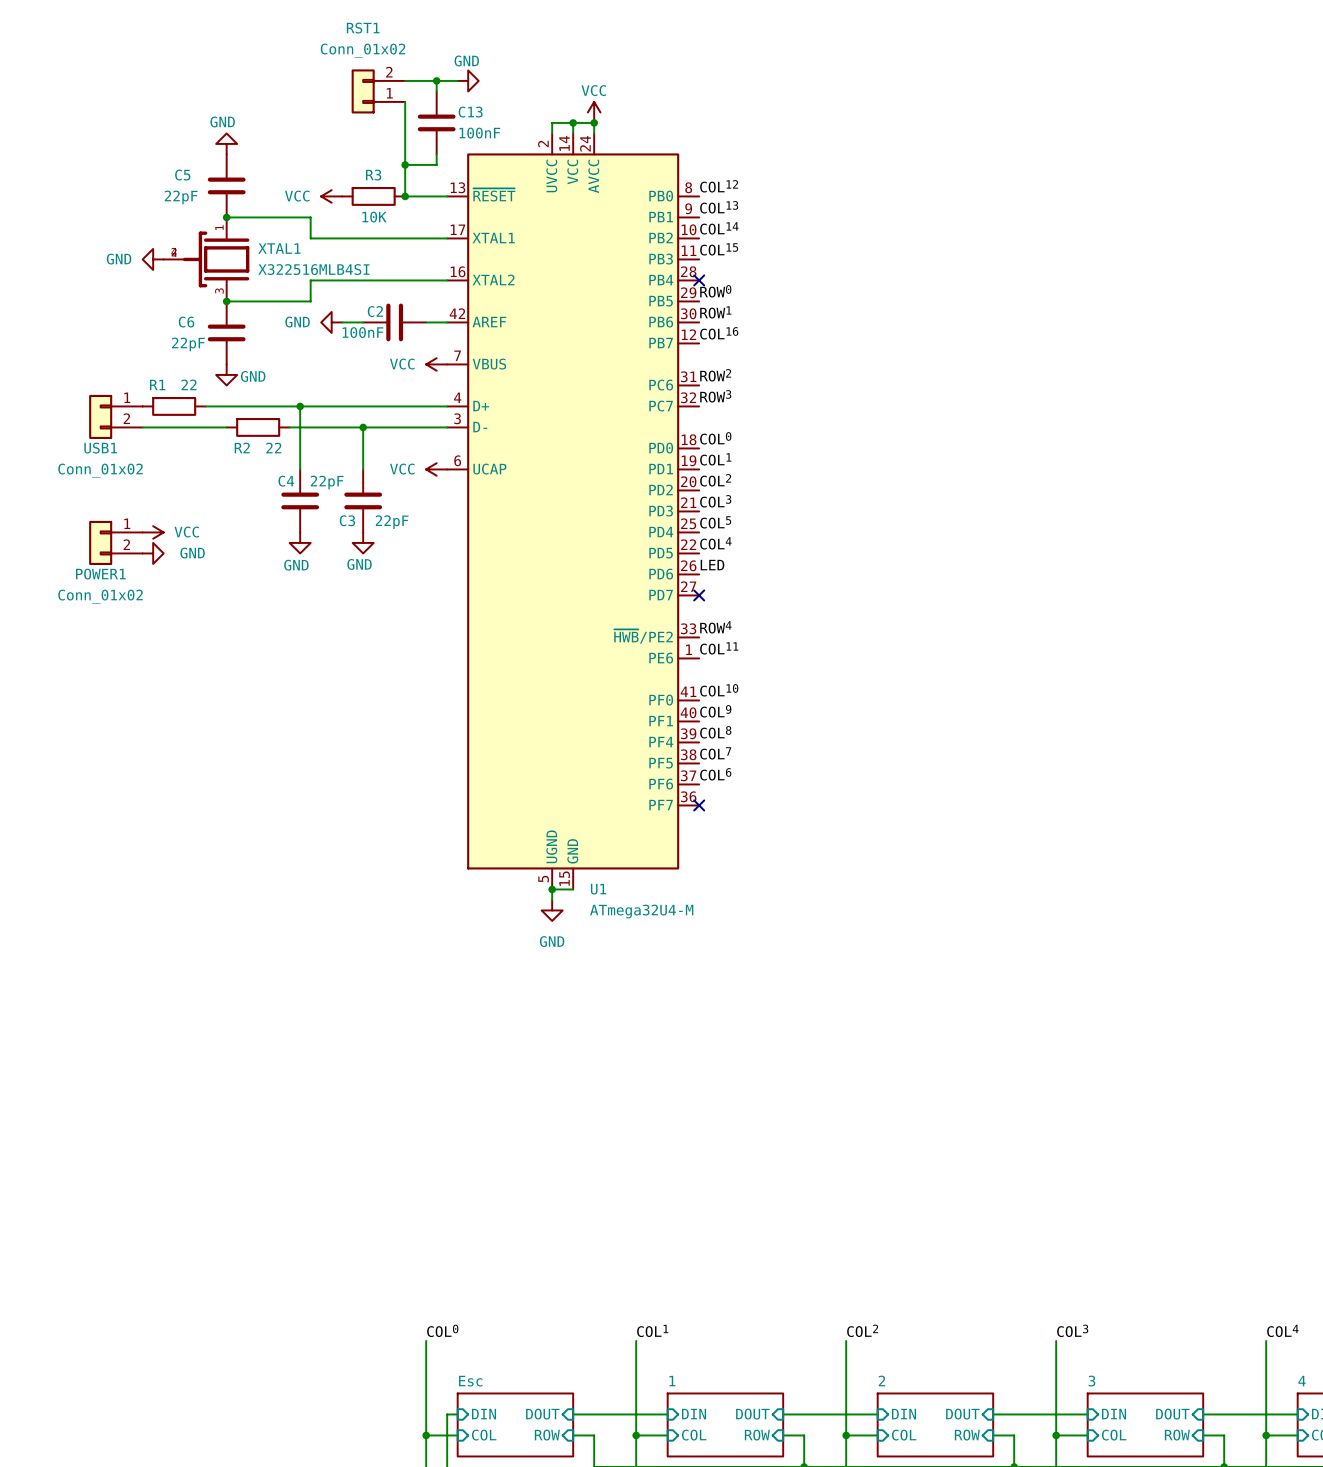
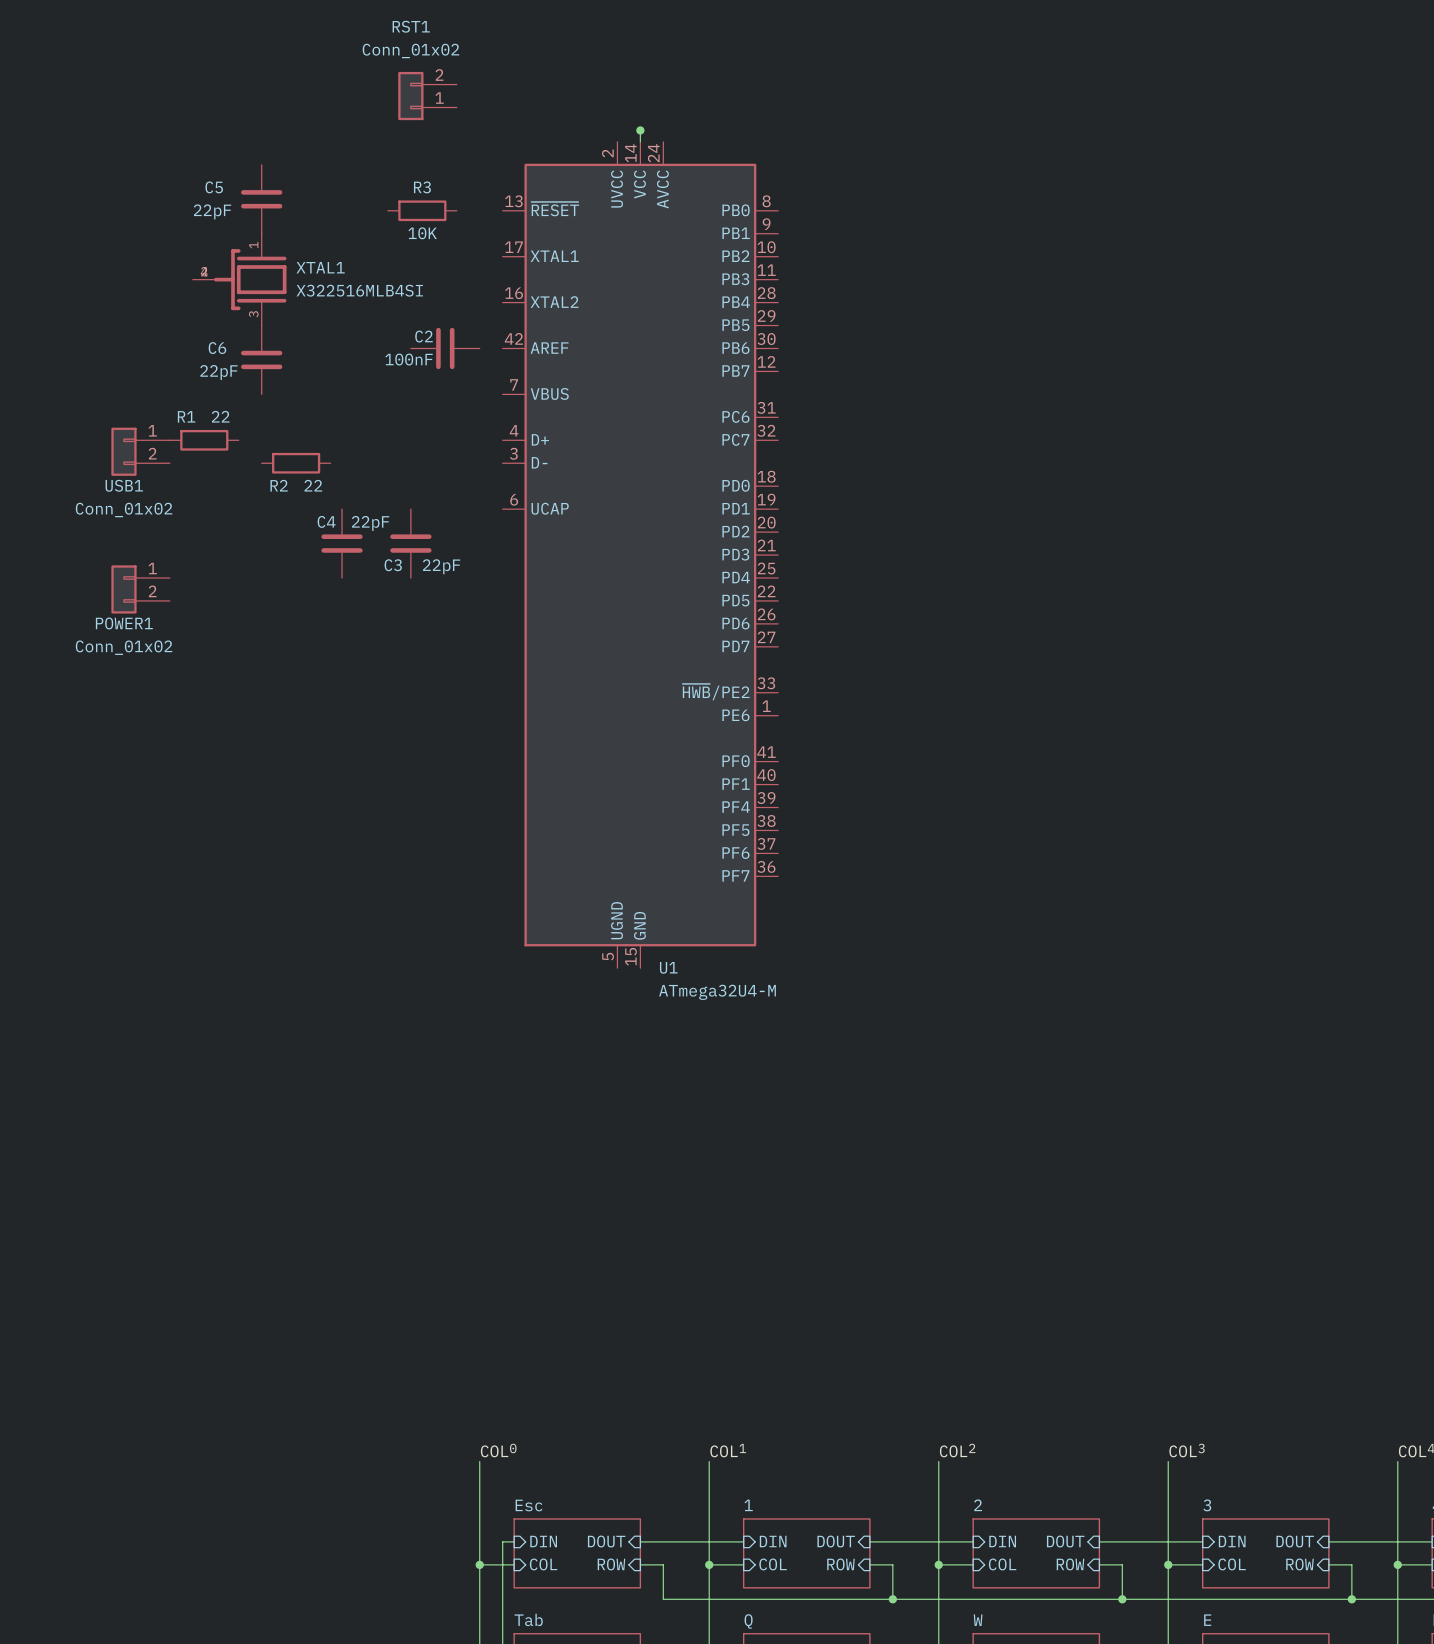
wire: (405, 80) (457, 80) -> none
wire: (436, 80) (436, 91) -> none
junction: (436, 80) -> none
power symbol: GND (468, 80) -> none
wire: (405, 101) (405, 196) (447, 196) -> none
power symbol: VCC (594, 112) -> none
C13: 100nF (436, 122) -> none
junction: (594, 122) -> none
wire: (552, 133) (552, 122) (594, 122) (594, 133) -> none
power symbol: GND (226, 143) -> none
wire: (436, 154) (436, 164) (405, 164) -> none
junction: (405, 164) -> none
label: COL12 (719, 186) -> none
power symbol: VCC (331, 196) -> none
junction: (405, 196) -> none
label: COL13 (719, 207) -> none
wire: (226, 217) (310, 217) (310, 238) (447, 238) -> none
junction: (226, 217) -> none
label: COL14 (719, 228) -> none
label: COL15 (719, 249) -> none
power symbol: GND (153, 259) -> none
wire: (447, 280) (310, 280) (310, 301) (226, 301) -> none
no-connect mark: (699, 280) -> none
label: ROW0 (715, 291) -> none
junction: (226, 301) -> none
label: ROW1 (715, 312) -> none
power symbol: GND (331, 322) -> none
wire: (342, 322) (363, 322) -> none
wire: (426, 322) (447, 322) -> none
label: COL16 (719, 333) -> none
power symbol: VCC (436, 364) -> none
power symbol: GND (226, 374) -> none
label: ROW2 (715, 375) -> none
label: ROW3 (715, 396) -> none
wire: (205, 406) (447, 406) -> none
wire: (300, 406) (300, 469) -> none
junction: (300, 406) -> none
wire: (142, 427) (226, 427) -> none
wire: (289, 427) (447, 427) -> none
wire: (363, 427) (363, 469) -> none
junction: (363, 427) -> none
label: COL0 (715, 438) -> none
label: COL1 (715, 459) -> none
power symbol: VCC (436, 469) -> none
label: COL2 (715, 480) -> none
label: COL3 (715, 501) -> none
label: COL5 (715, 522) -> none
power symbol: VCC (153, 532) -> none
power symbol: GND (300, 542) -> none
power symbol: GND (363, 542) -> none
label: COL4 (715, 543) -> none
power symbol: GND (153, 553) -> none
label: LED (712, 565) -> none
no-connect mark: (699, 595) -> none
label: ROW4 (715, 627) -> none
label: COL11 (719, 648) -> none
label: COL10 (719, 690) -> none
label: COL9 (715, 711) -> none
label: COL8 (715, 732) -> none
label: COL7 (715, 753) -> none
label: COL6 (715, 774) -> none
no-connect mark: (699, 805) -> none
junction: (552, 889) -> none
wire: (573, 889) (552, 889) (552, 899) -> none
power symbol: GND (552, 910) -> none

